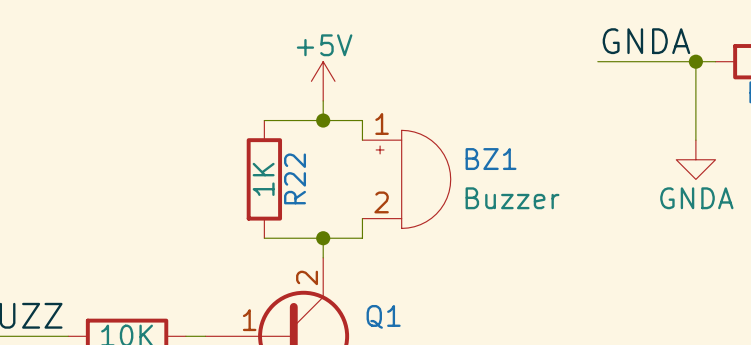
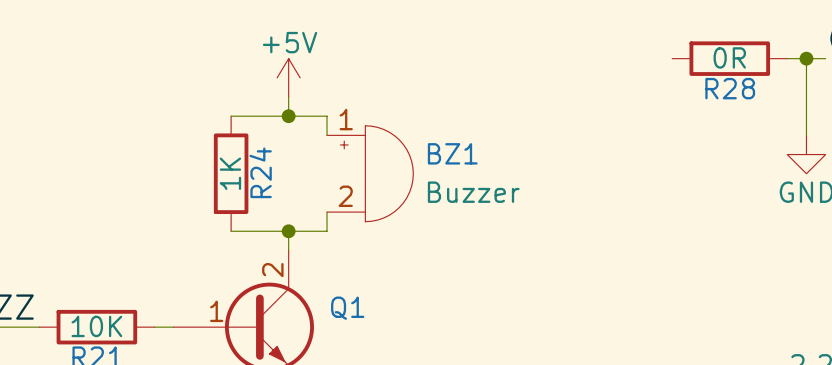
label: GNDA (646, 41) -> none
wire: (597, 61) (715, 61) -> none
wire: (695, 61) (695, 140) -> none
junction: (695, 61) -> none
power symbol: GNDA (695, 159) -> none
R22 name: R22 (295, 178) -> R24 (260, 172)

